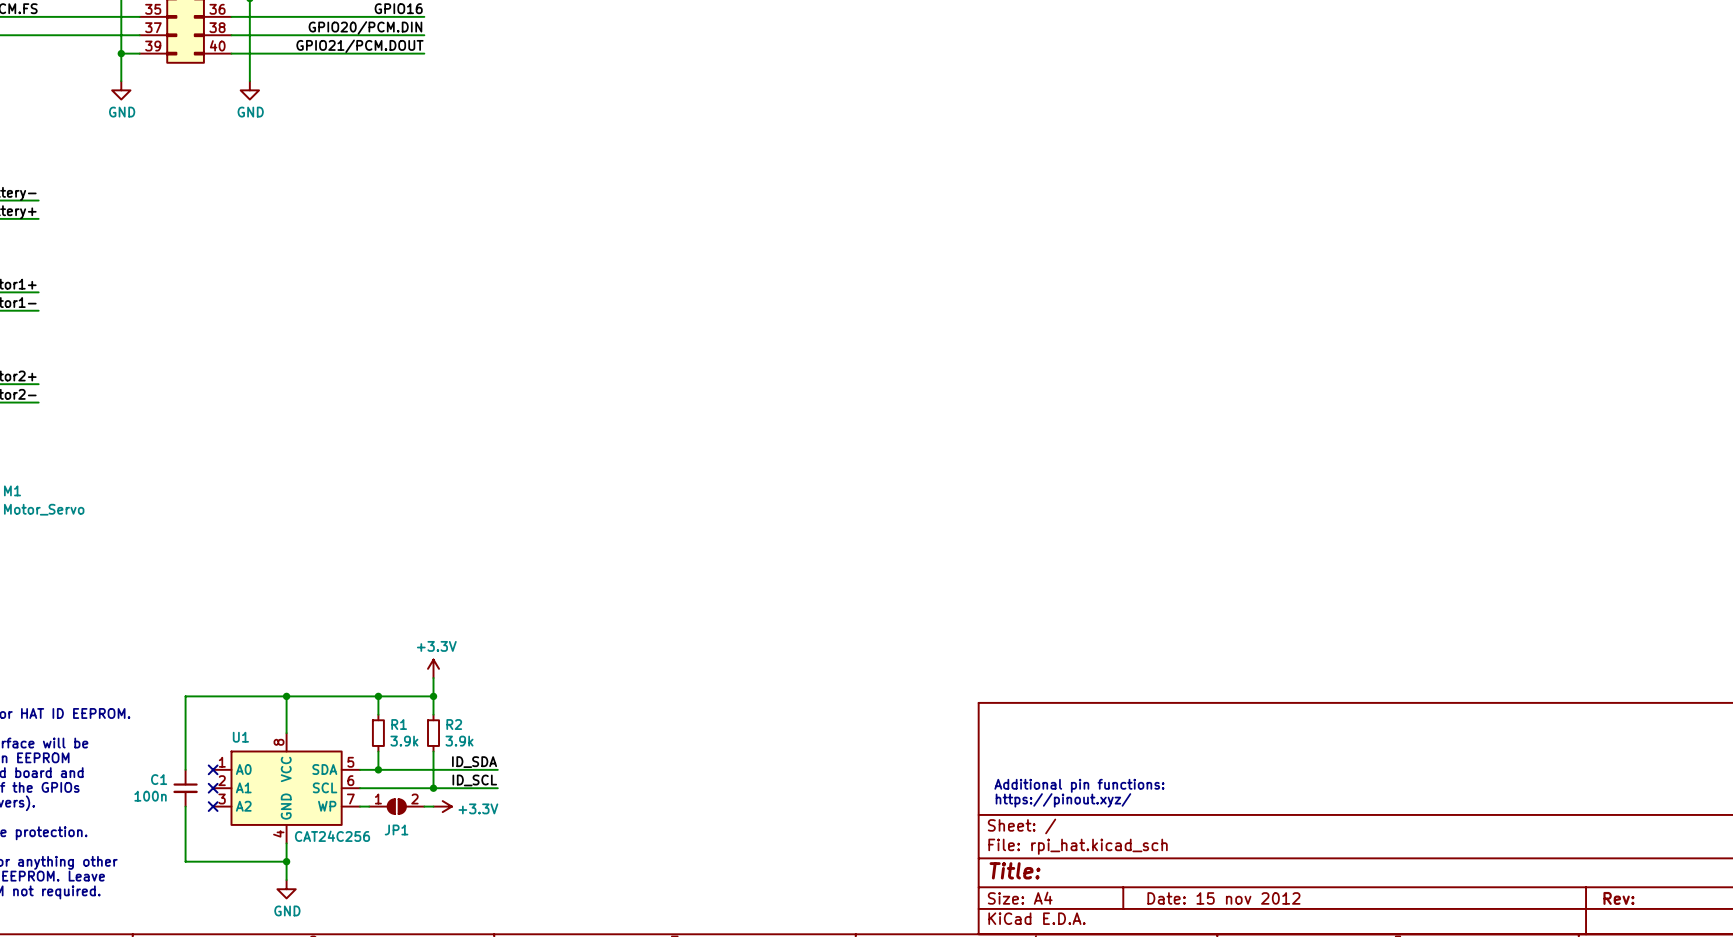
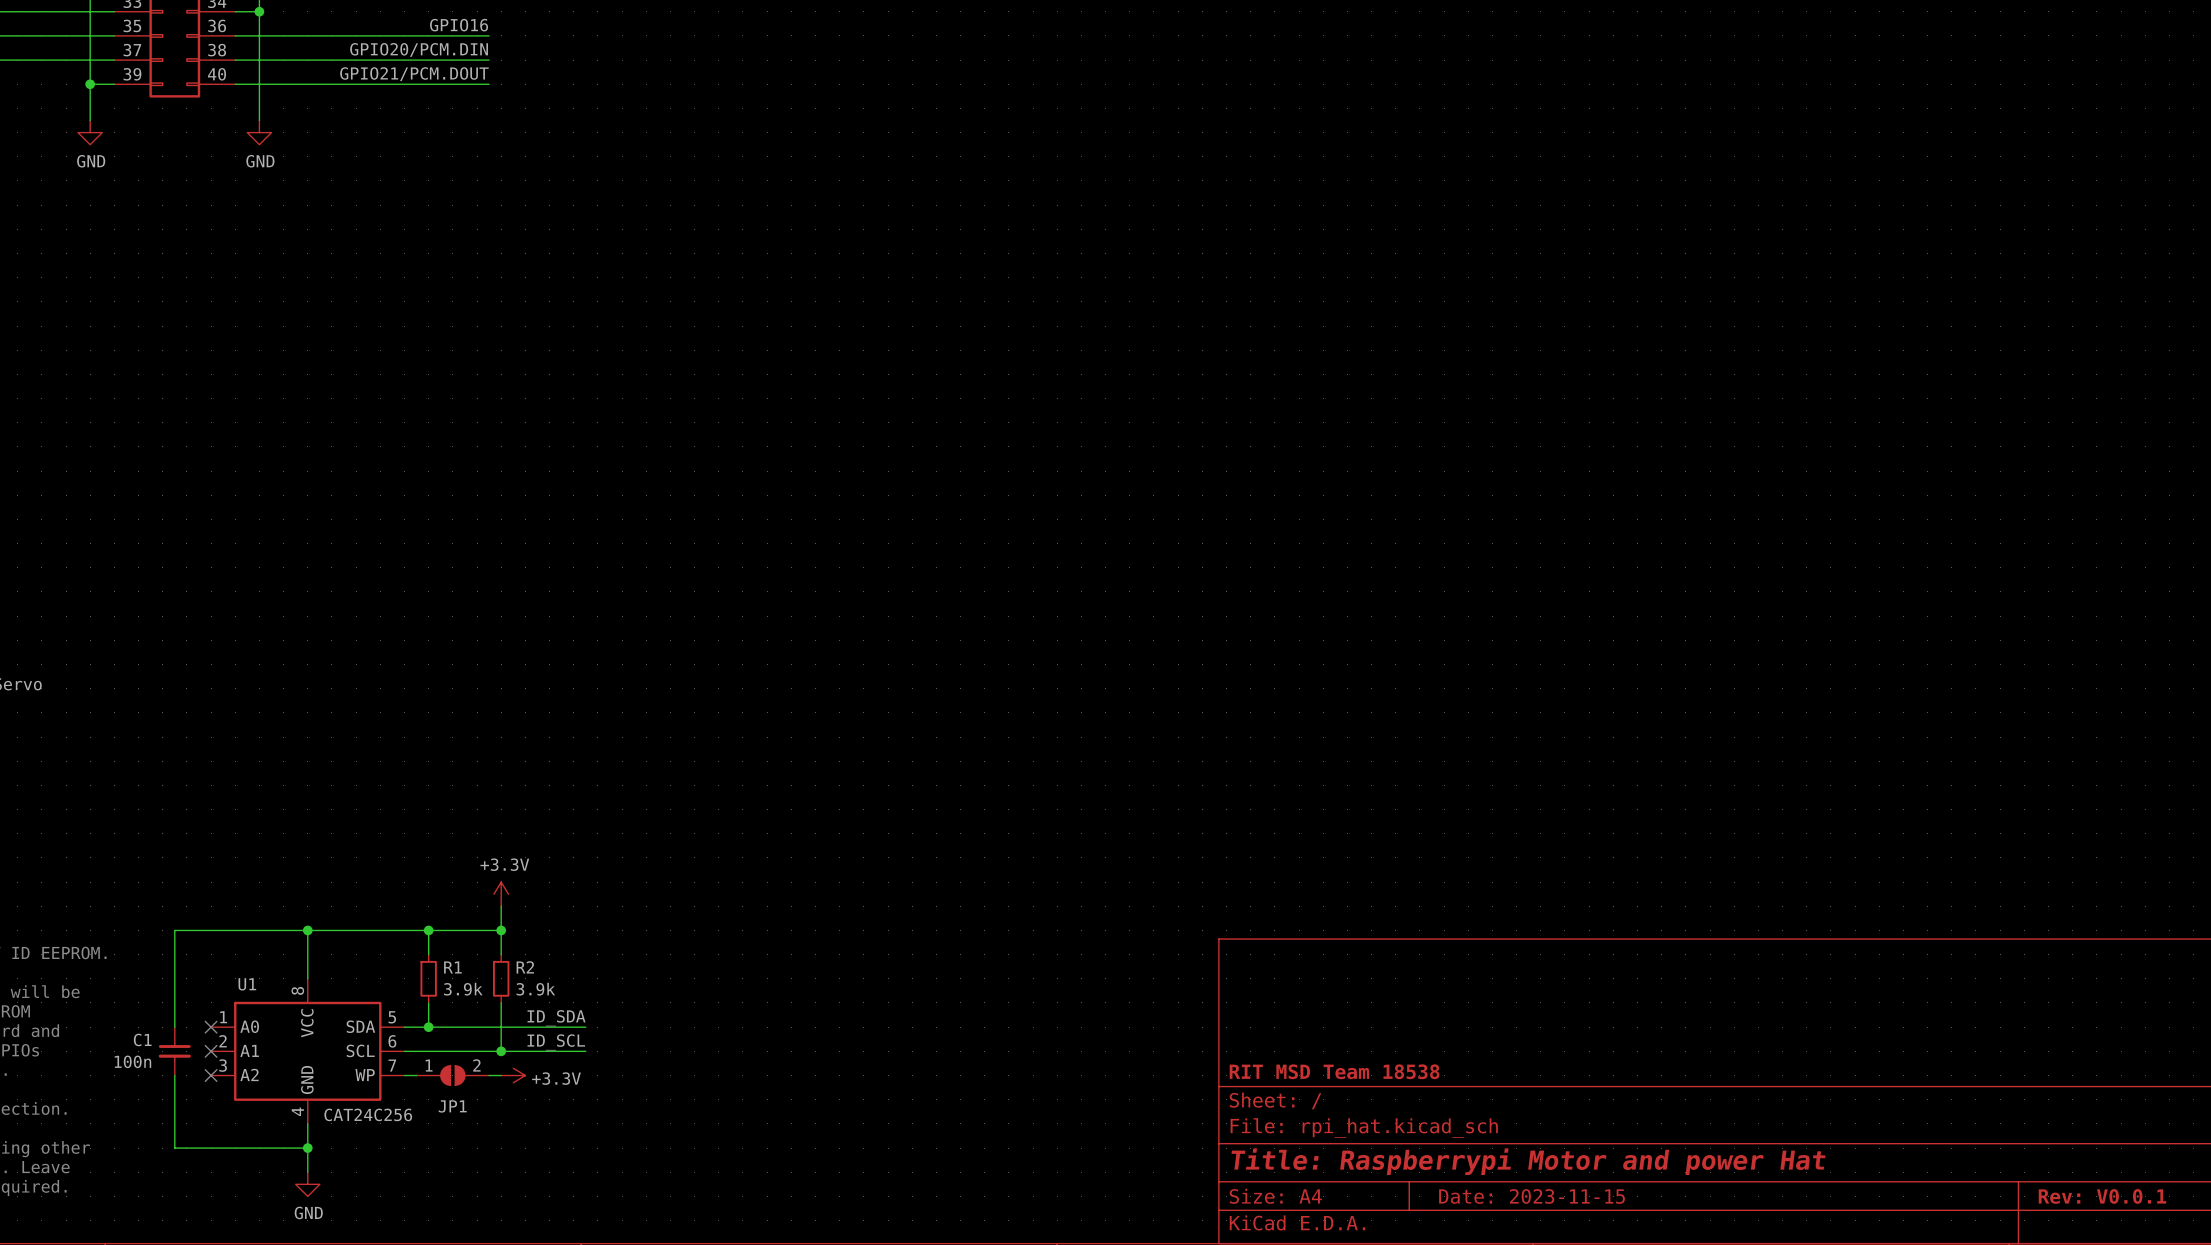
text: Additional pin functions: (1079, 785) -> none
text: https://pinout.xyz/ (1063, 800) -> none
title block: none -> RIT MSD Team 18538 (1334, 1071)
title block: Title: (1015, 870) -> Title: Raspberrypi Motor and power Hat (1528, 1161)
title block: Date: 15 nov 2012 (1223, 898) -> Date: 2023-11-15 (1532, 1196)
title block: Rev: (1618, 898) -> Rev: V0.0.1 (2102, 1196)

